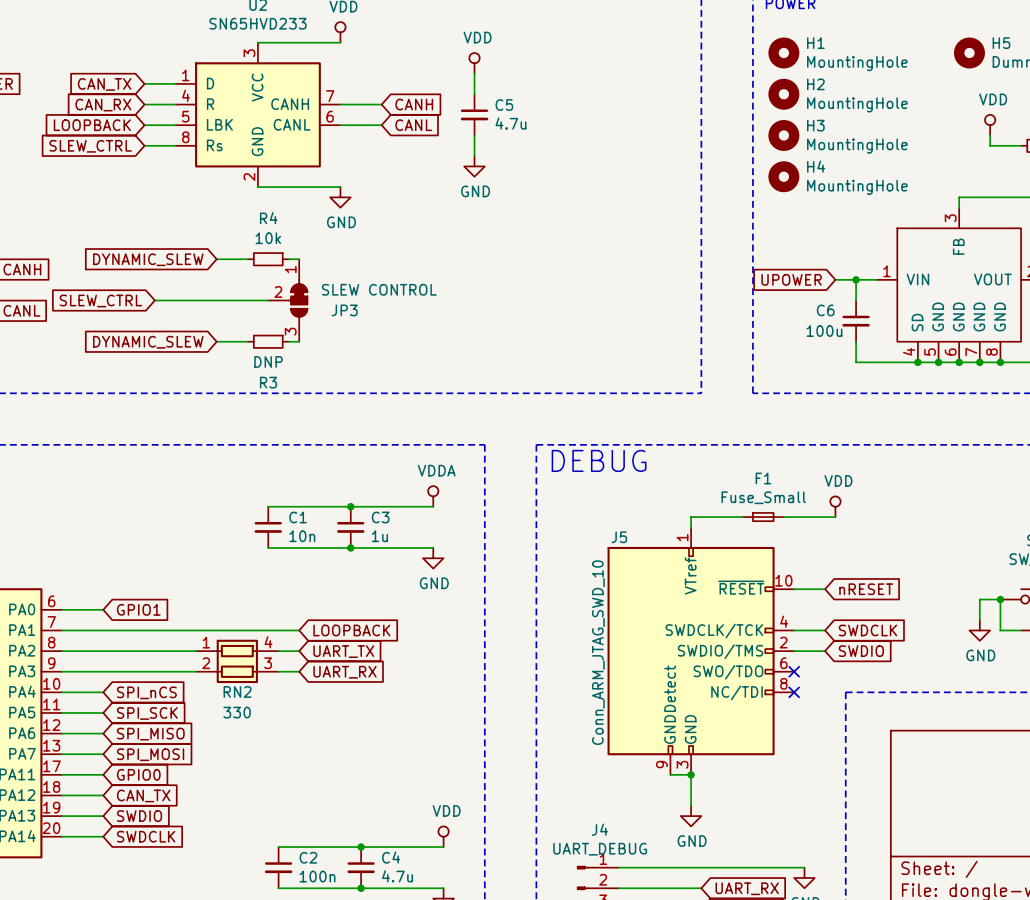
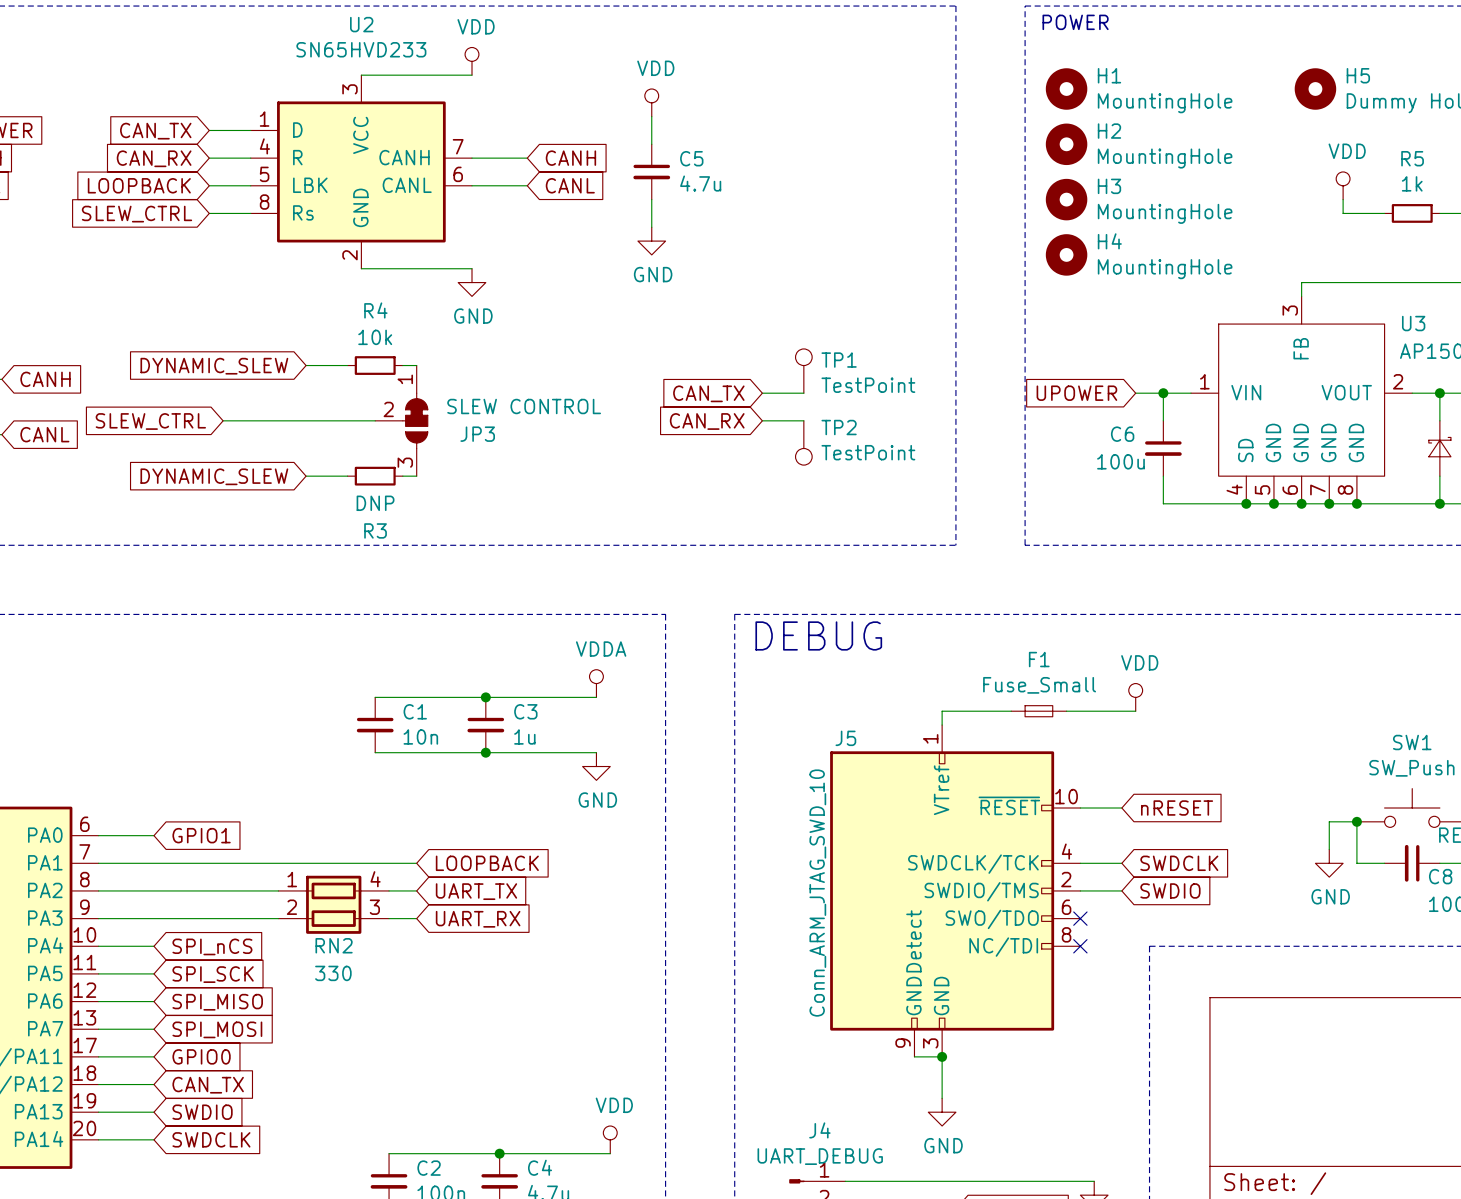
TP1: none -> TestPoint (803, 371)
wire: none -> (762, 393) (803, 393)
global label: none -> CAN_TX (708, 393)
global label: none -> CAN_RX (707, 421)
wire: none -> (762, 420) (803, 420)
TP2: none -> TestPoint (803, 442)

